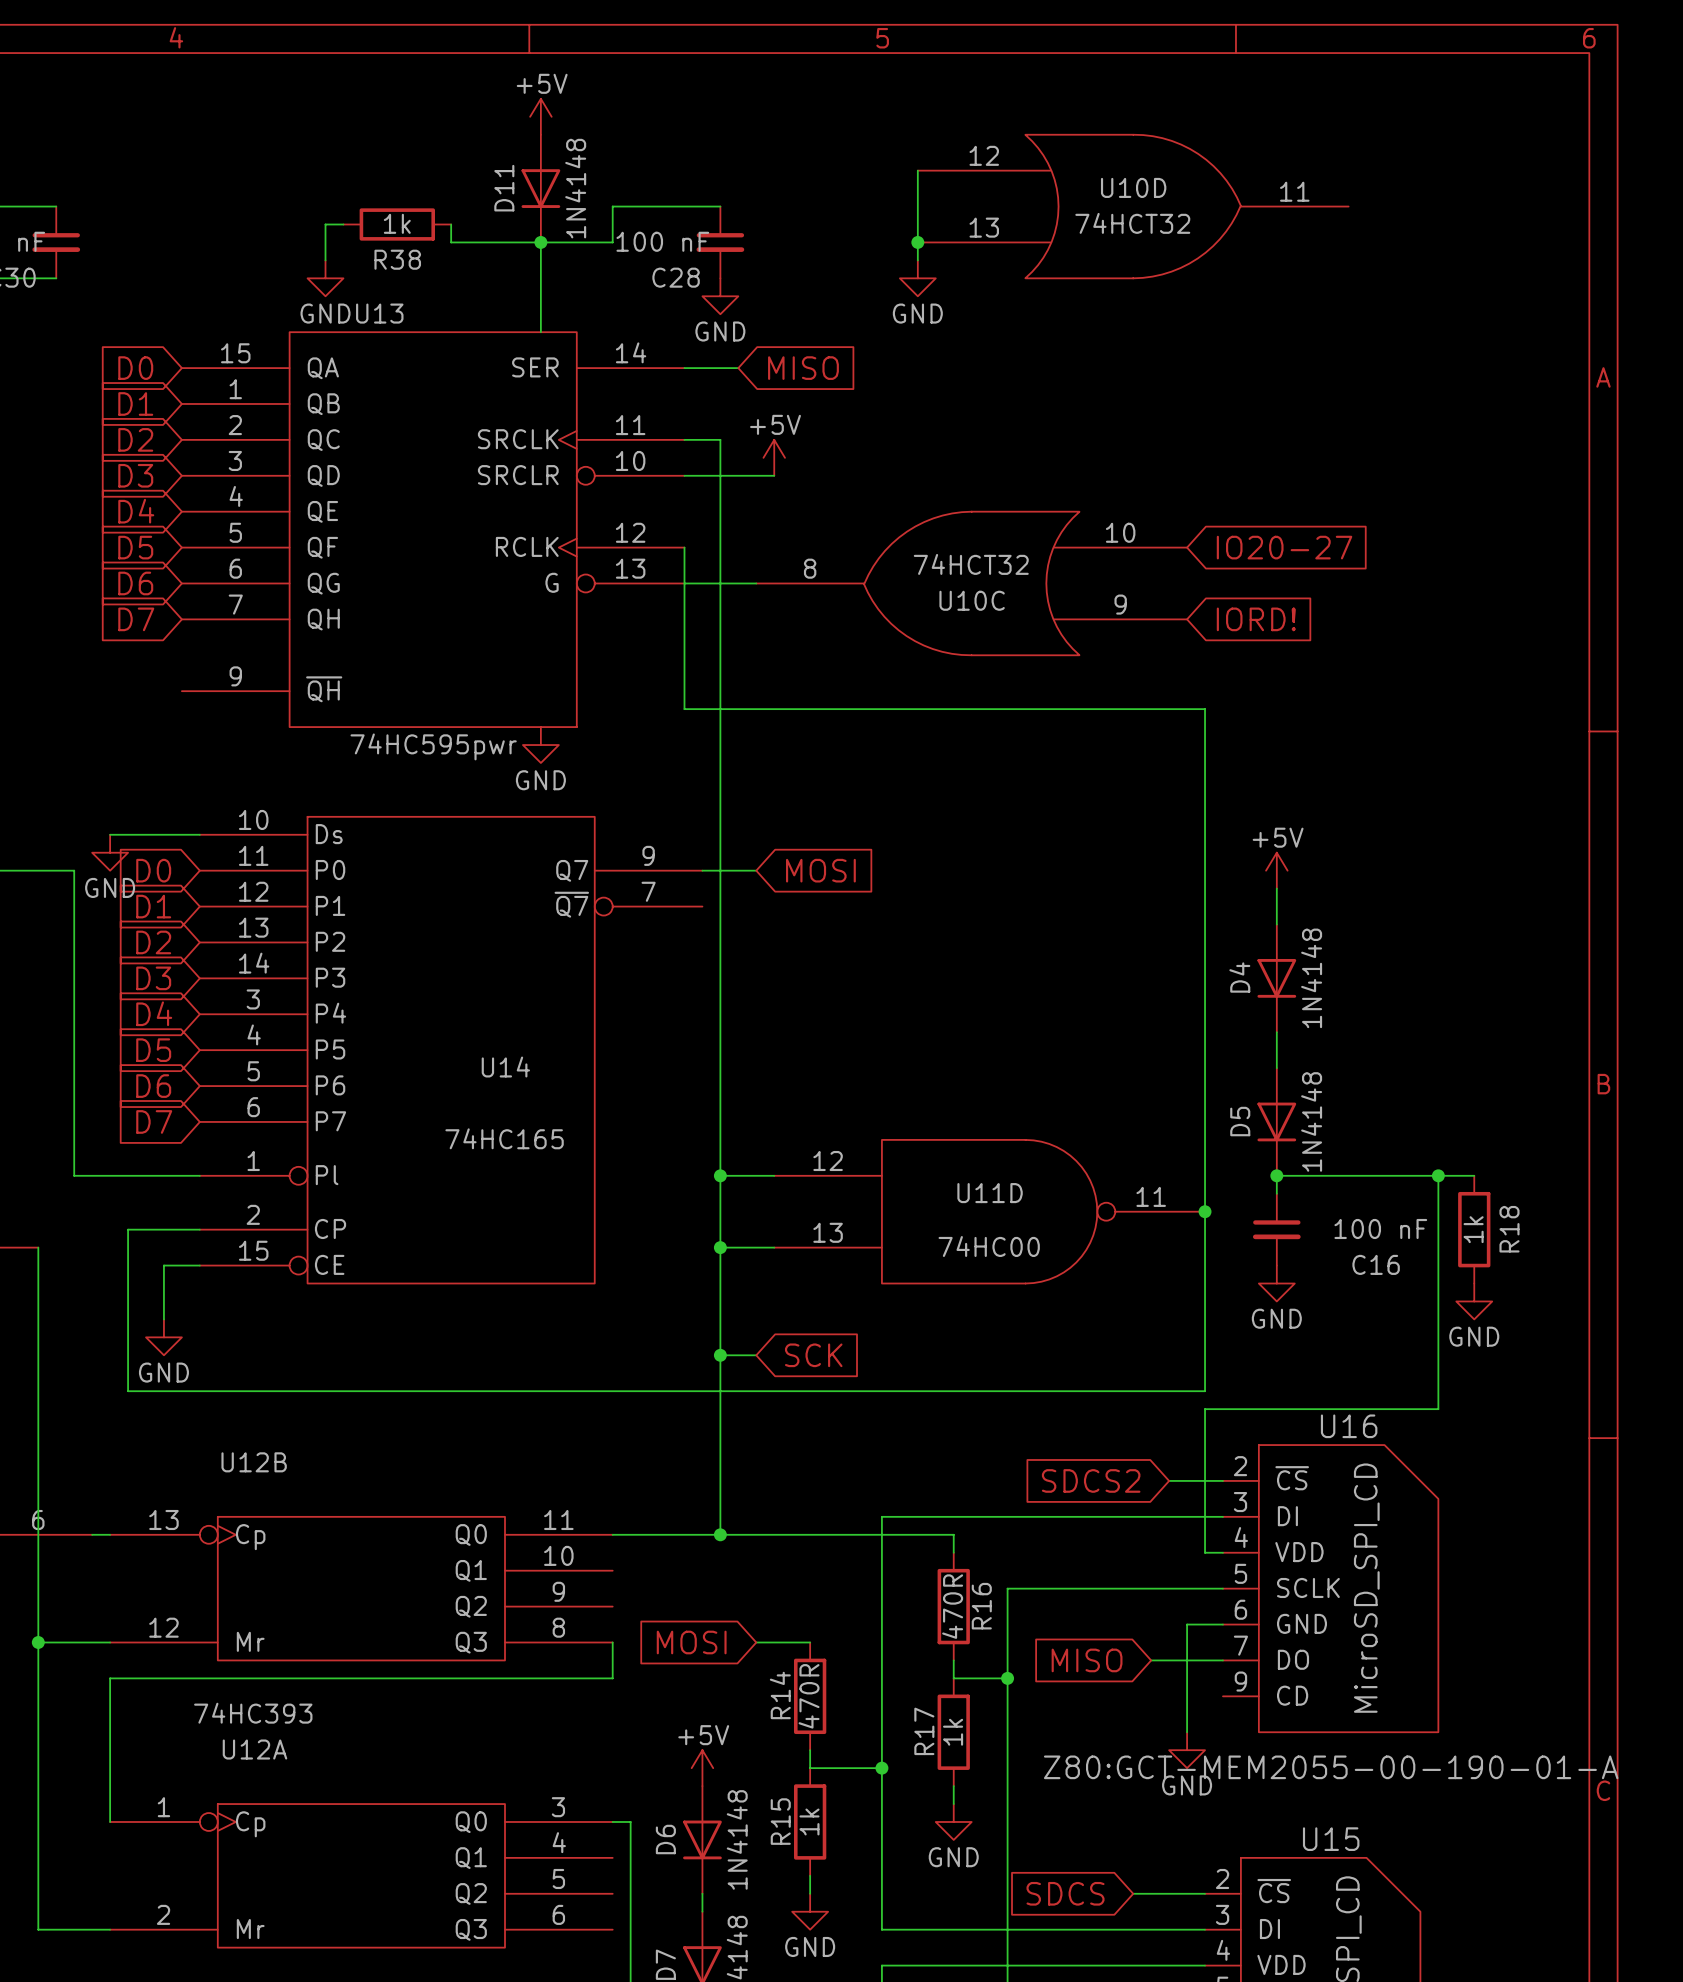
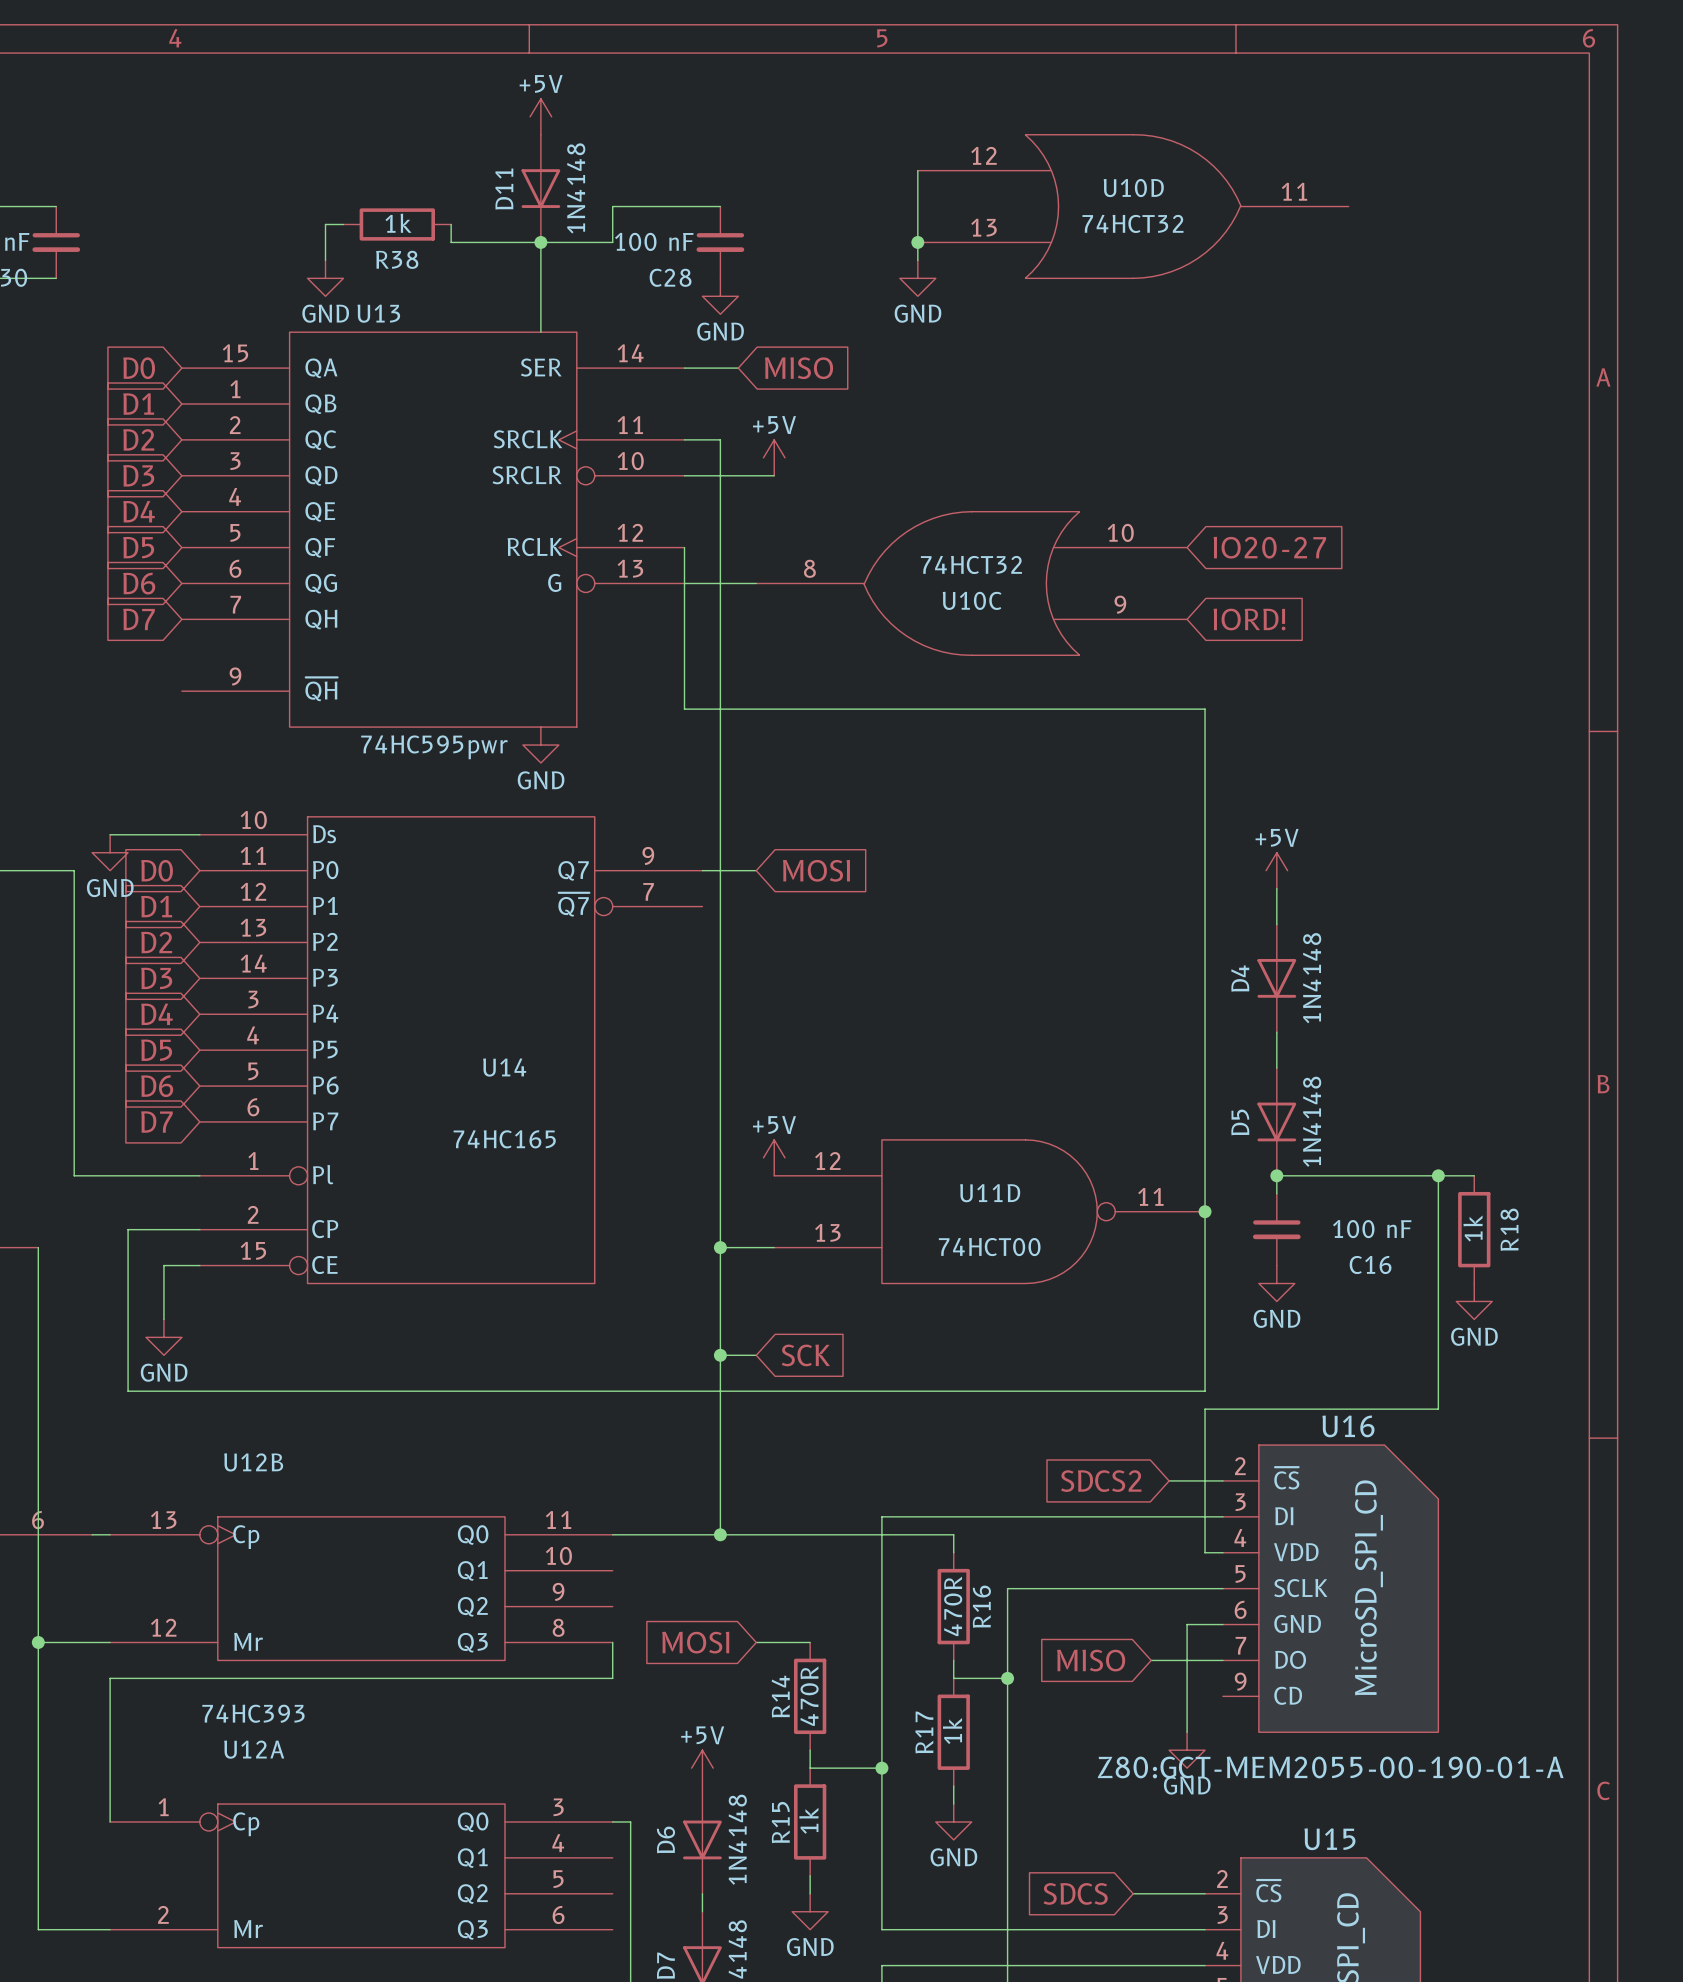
power symbol: none -> +5V (774, 1157)
wire: (720, 1175) (774, 1175) -> none
junction: (720, 1175) -> none
U11D value: 74HC00 (989, 1246) -> 74HCT00 (989, 1247)

